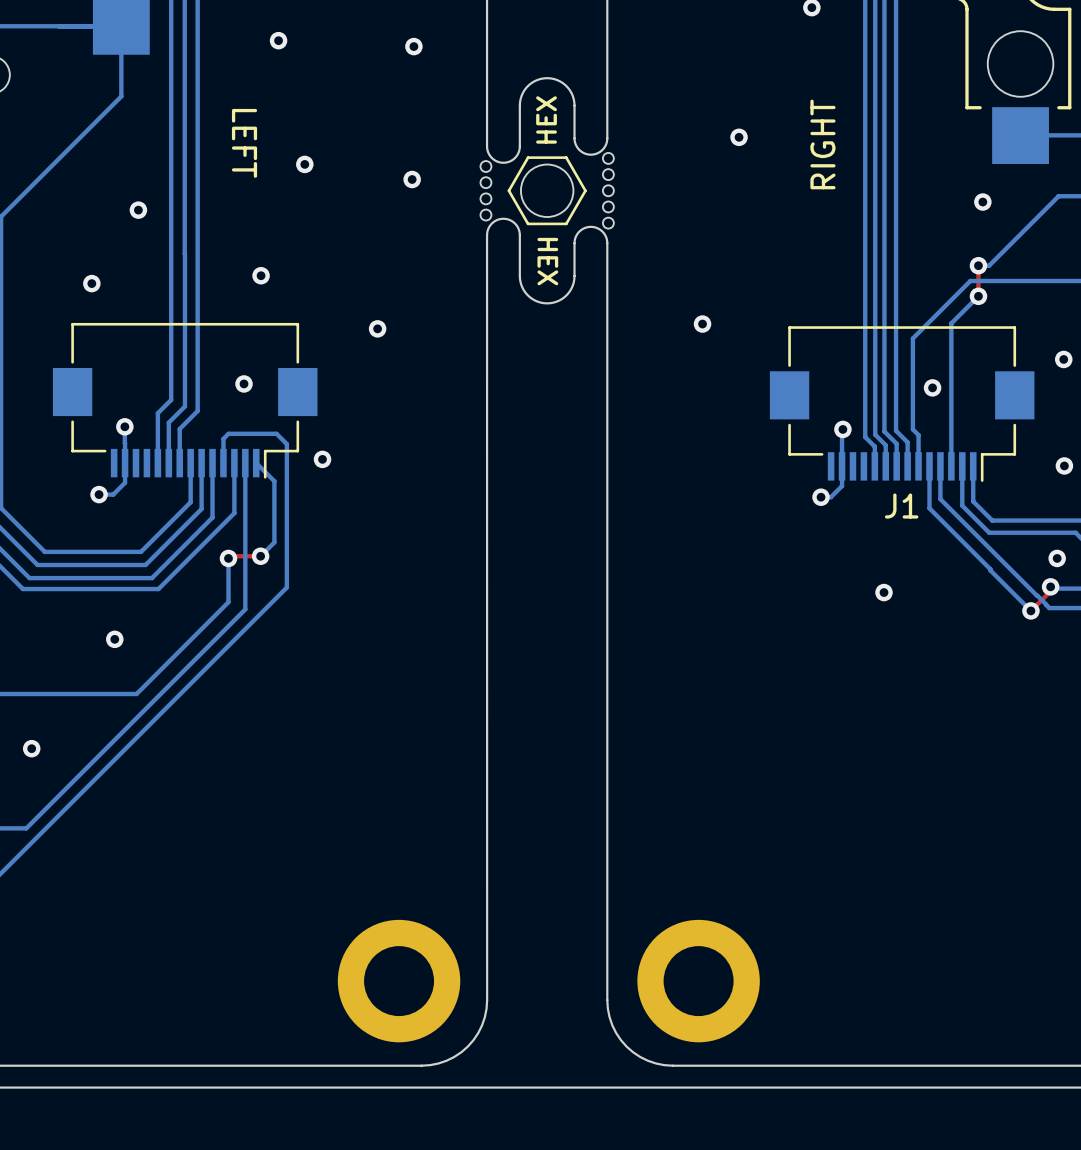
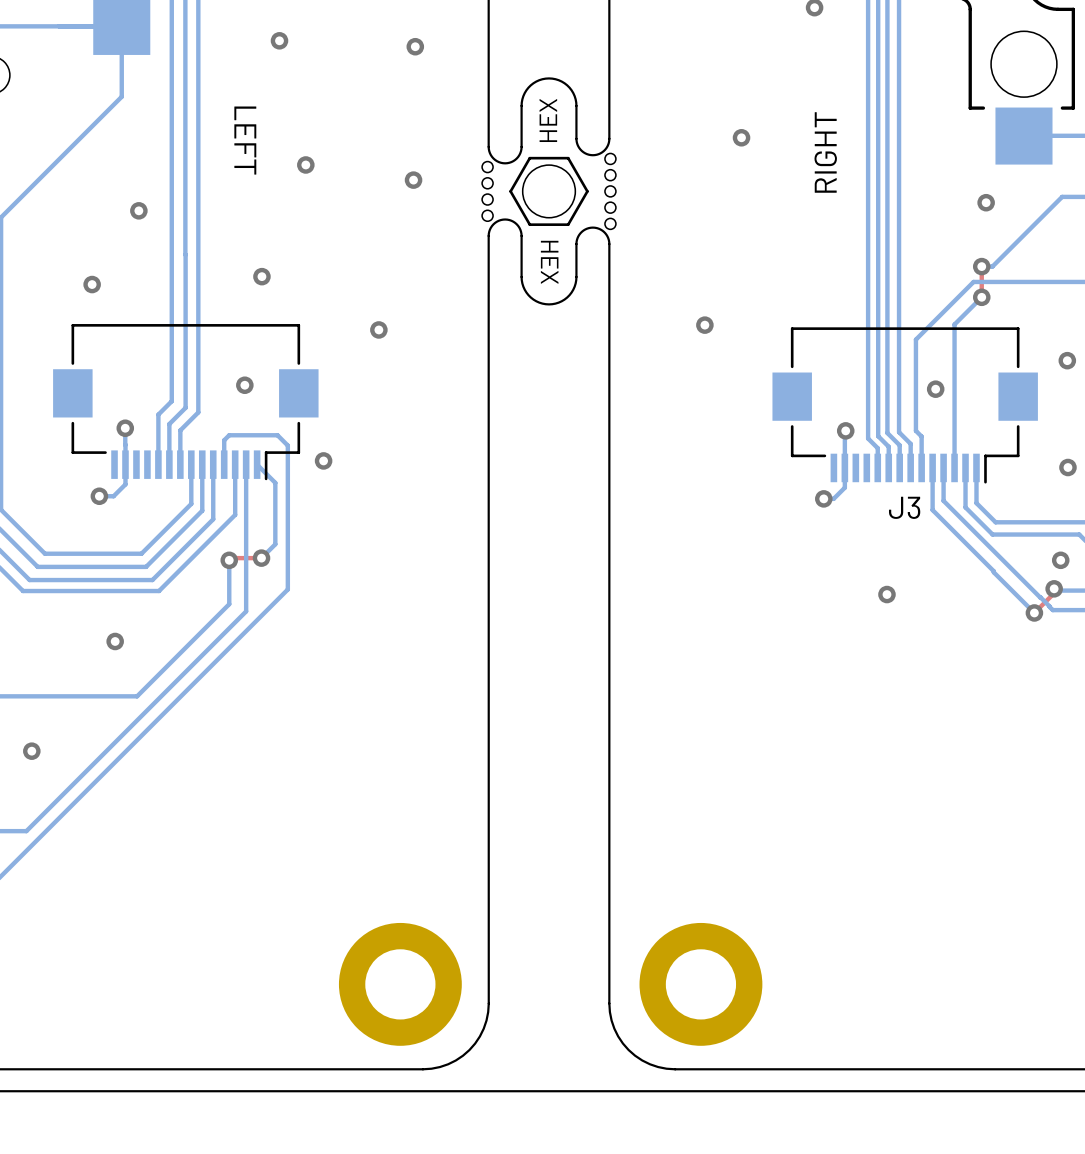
J1 name: J1 (901, 506) -> J3 (904, 507)

